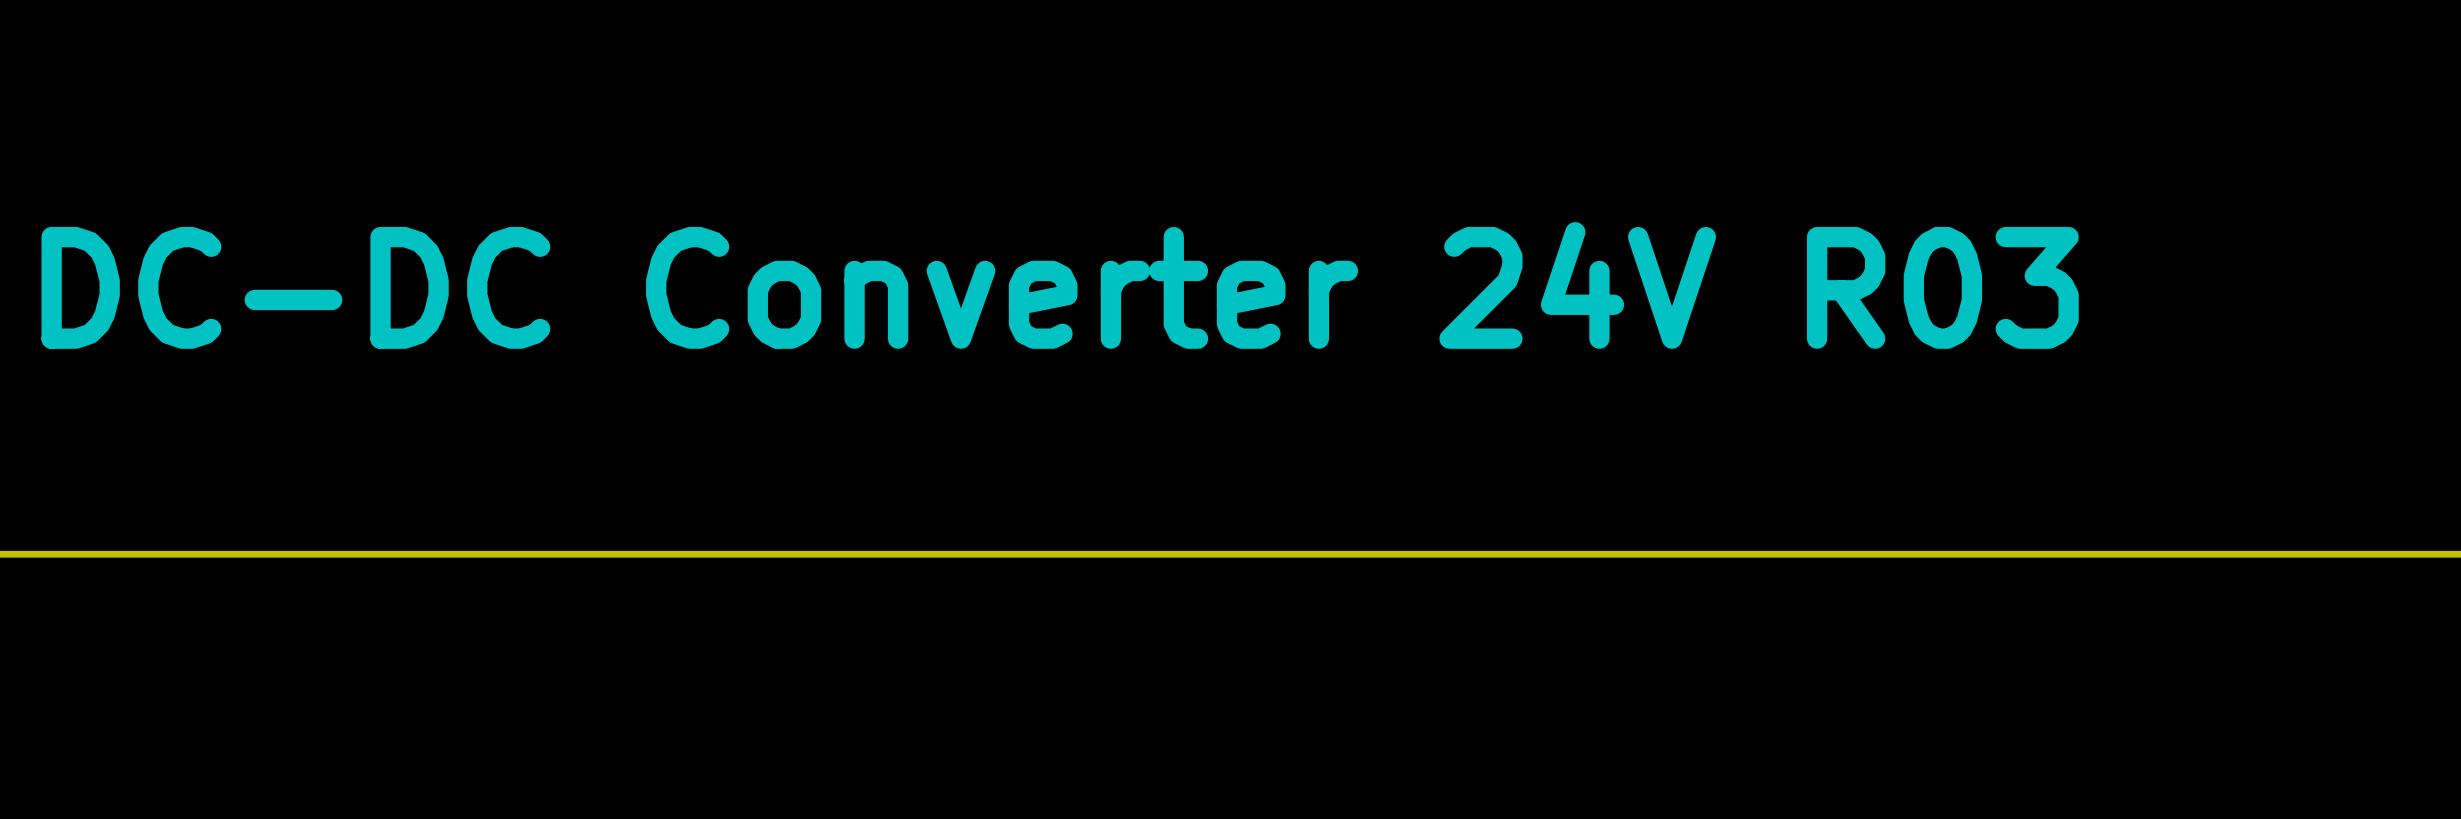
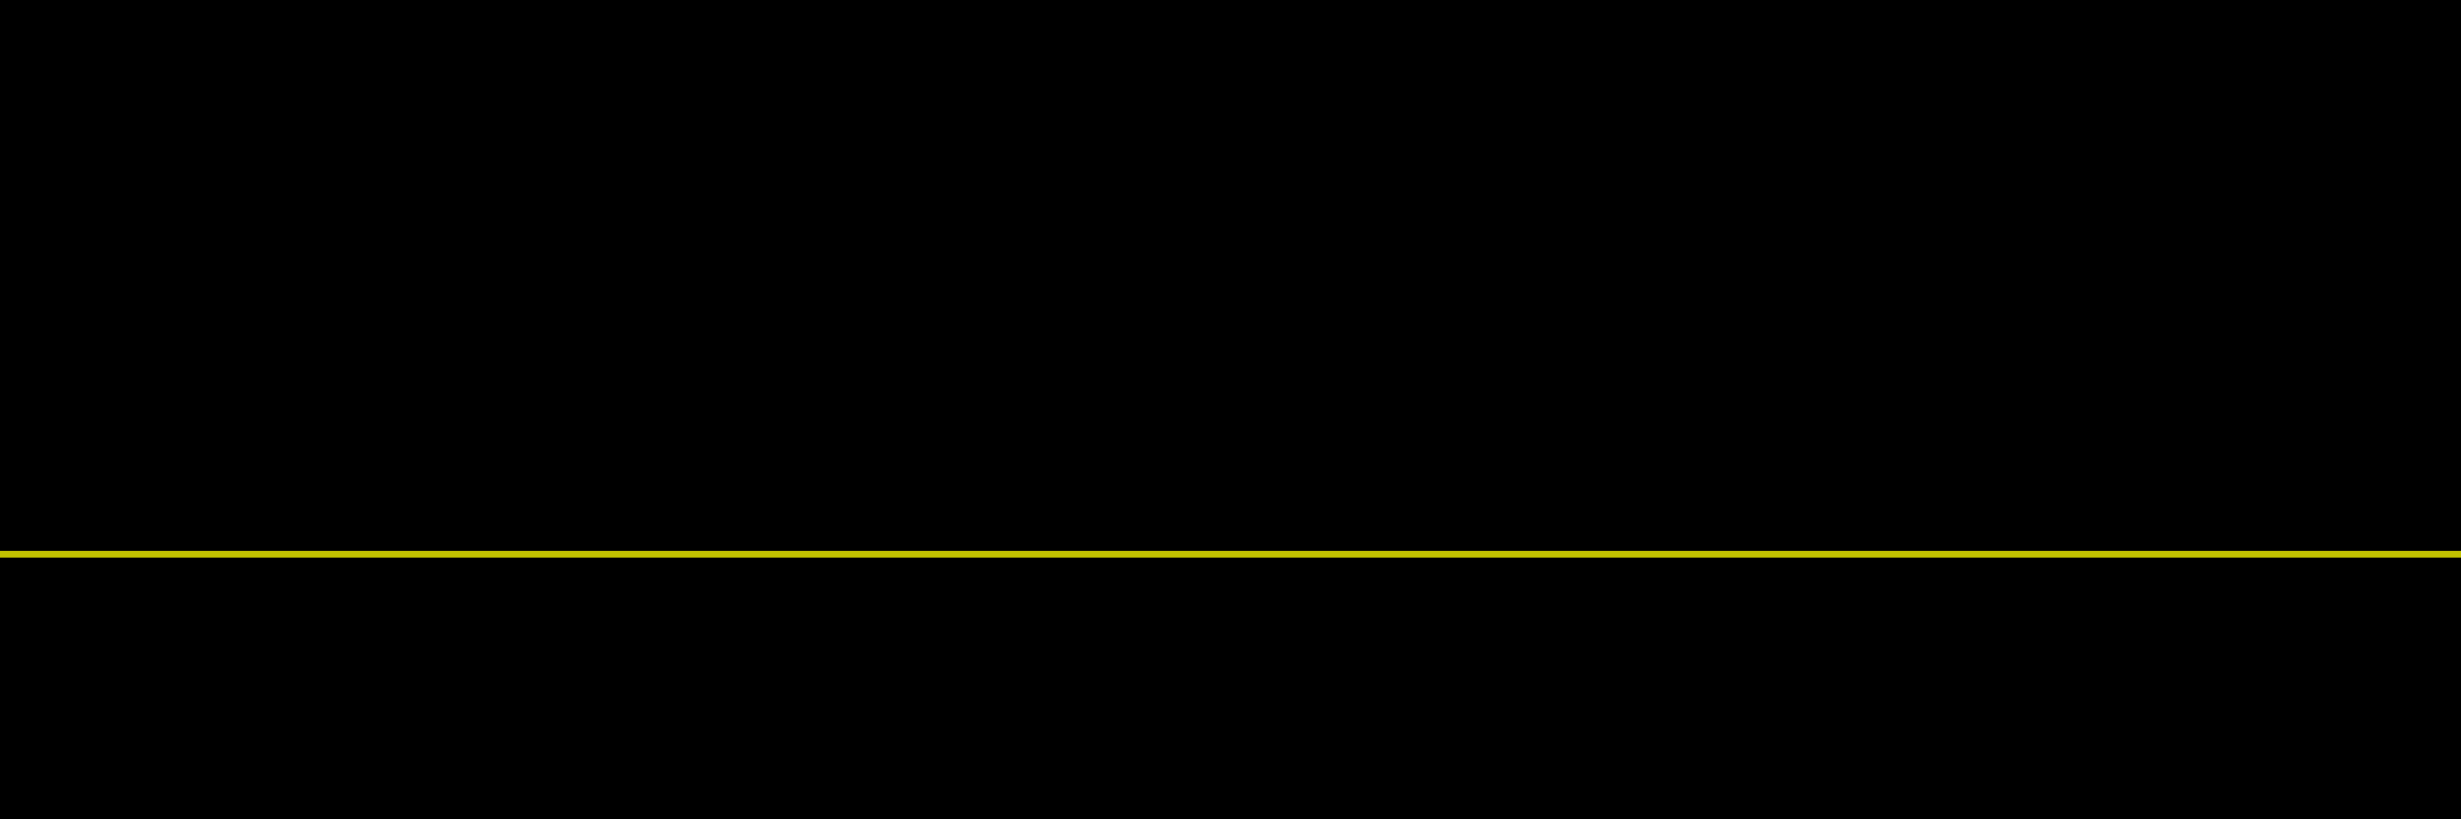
text: DC-DC Converter 24V R03 (1060, 285) -> none

